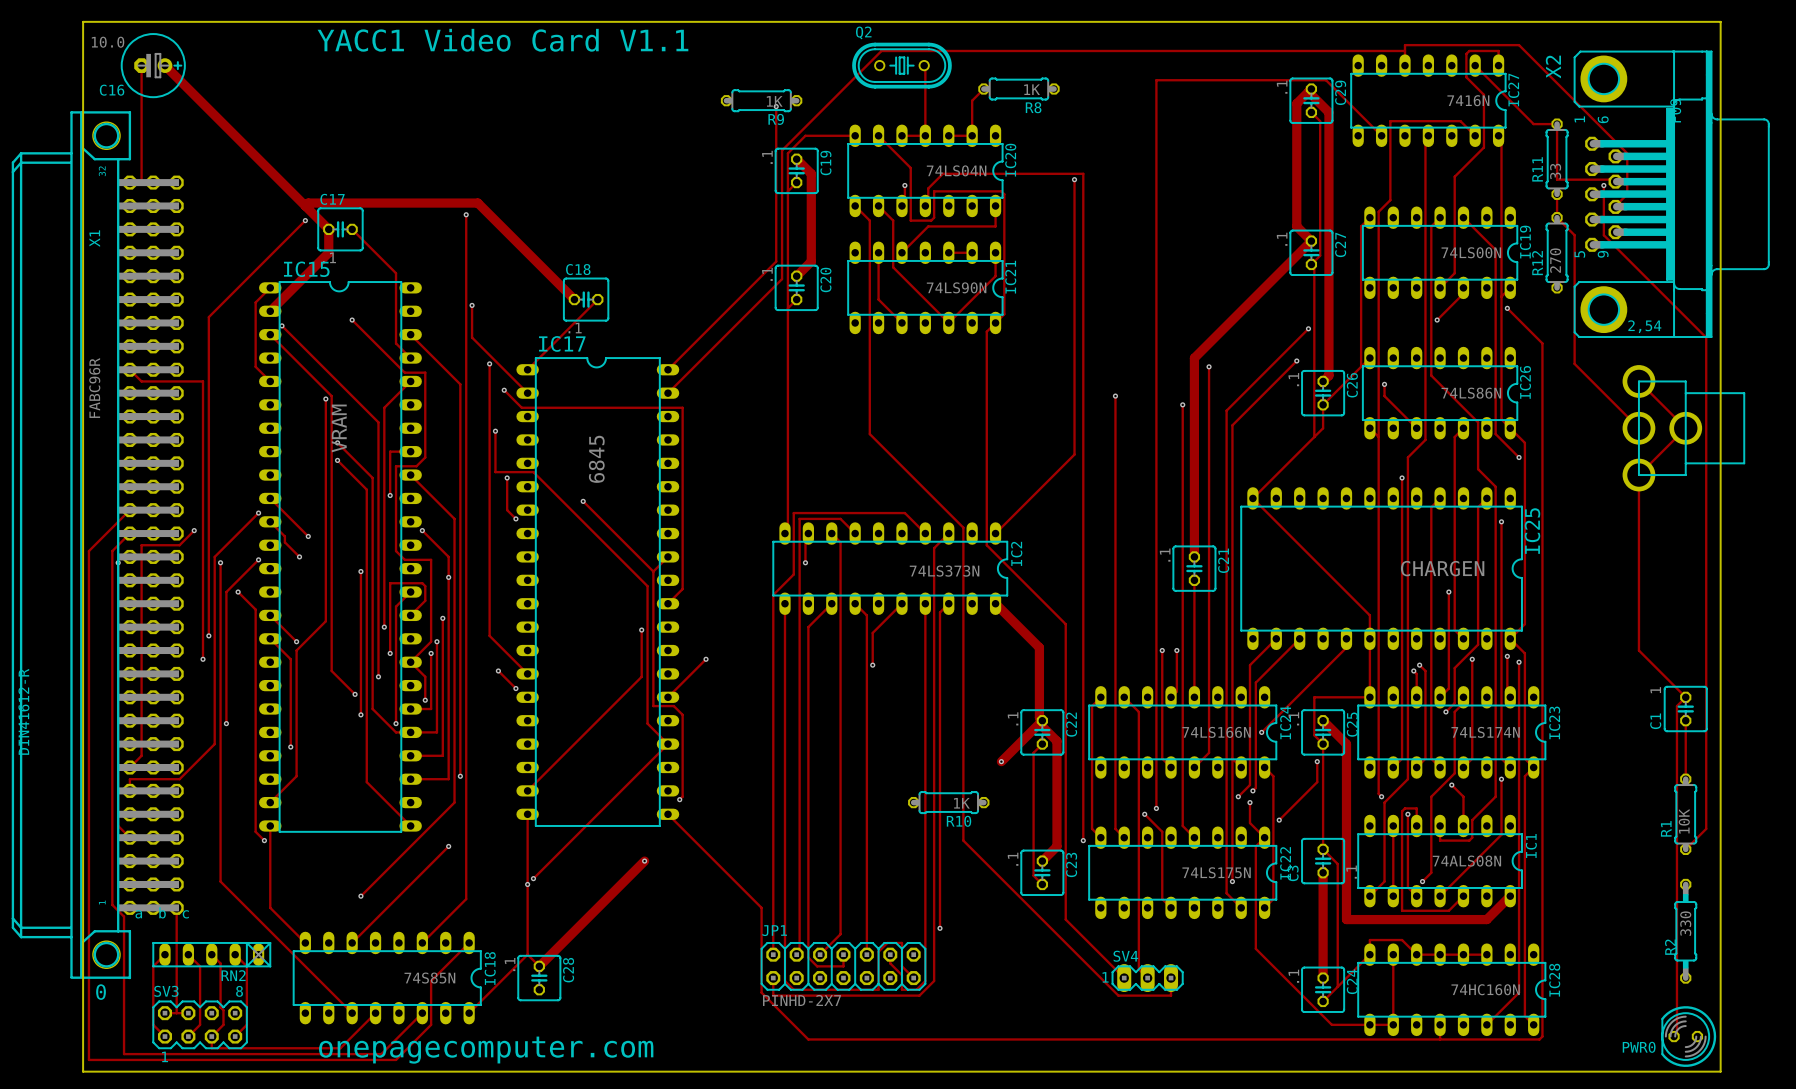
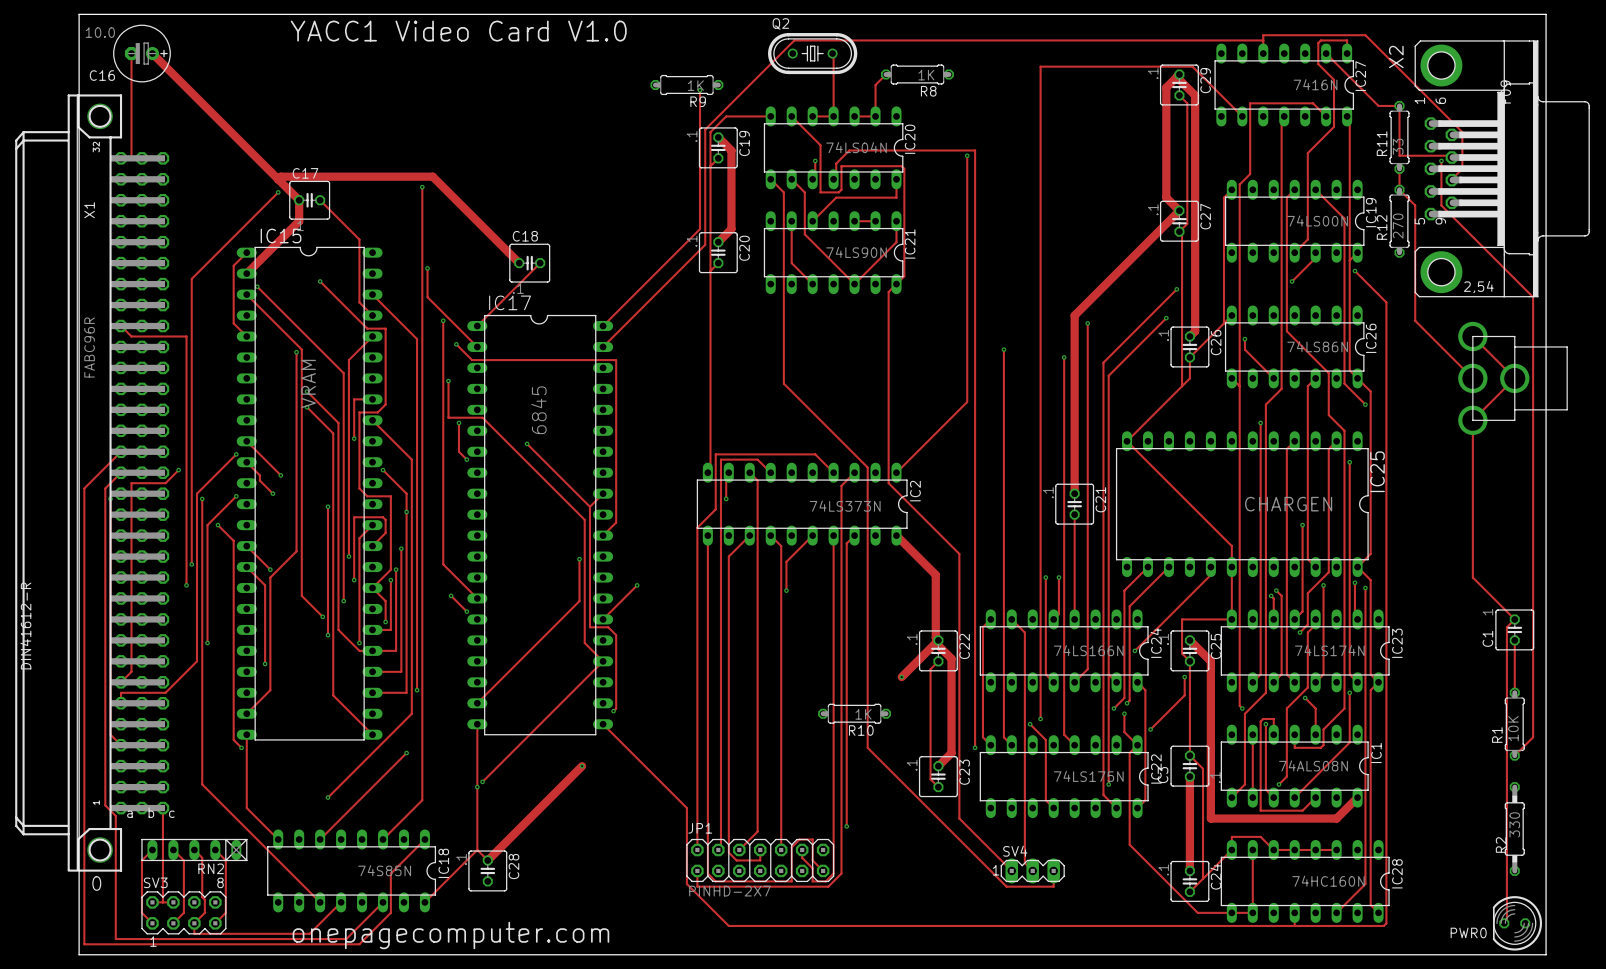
text: YACC1 Video Card V1.1 (502, 40) -> YACC1 Video Card V1.0 (458, 31)

